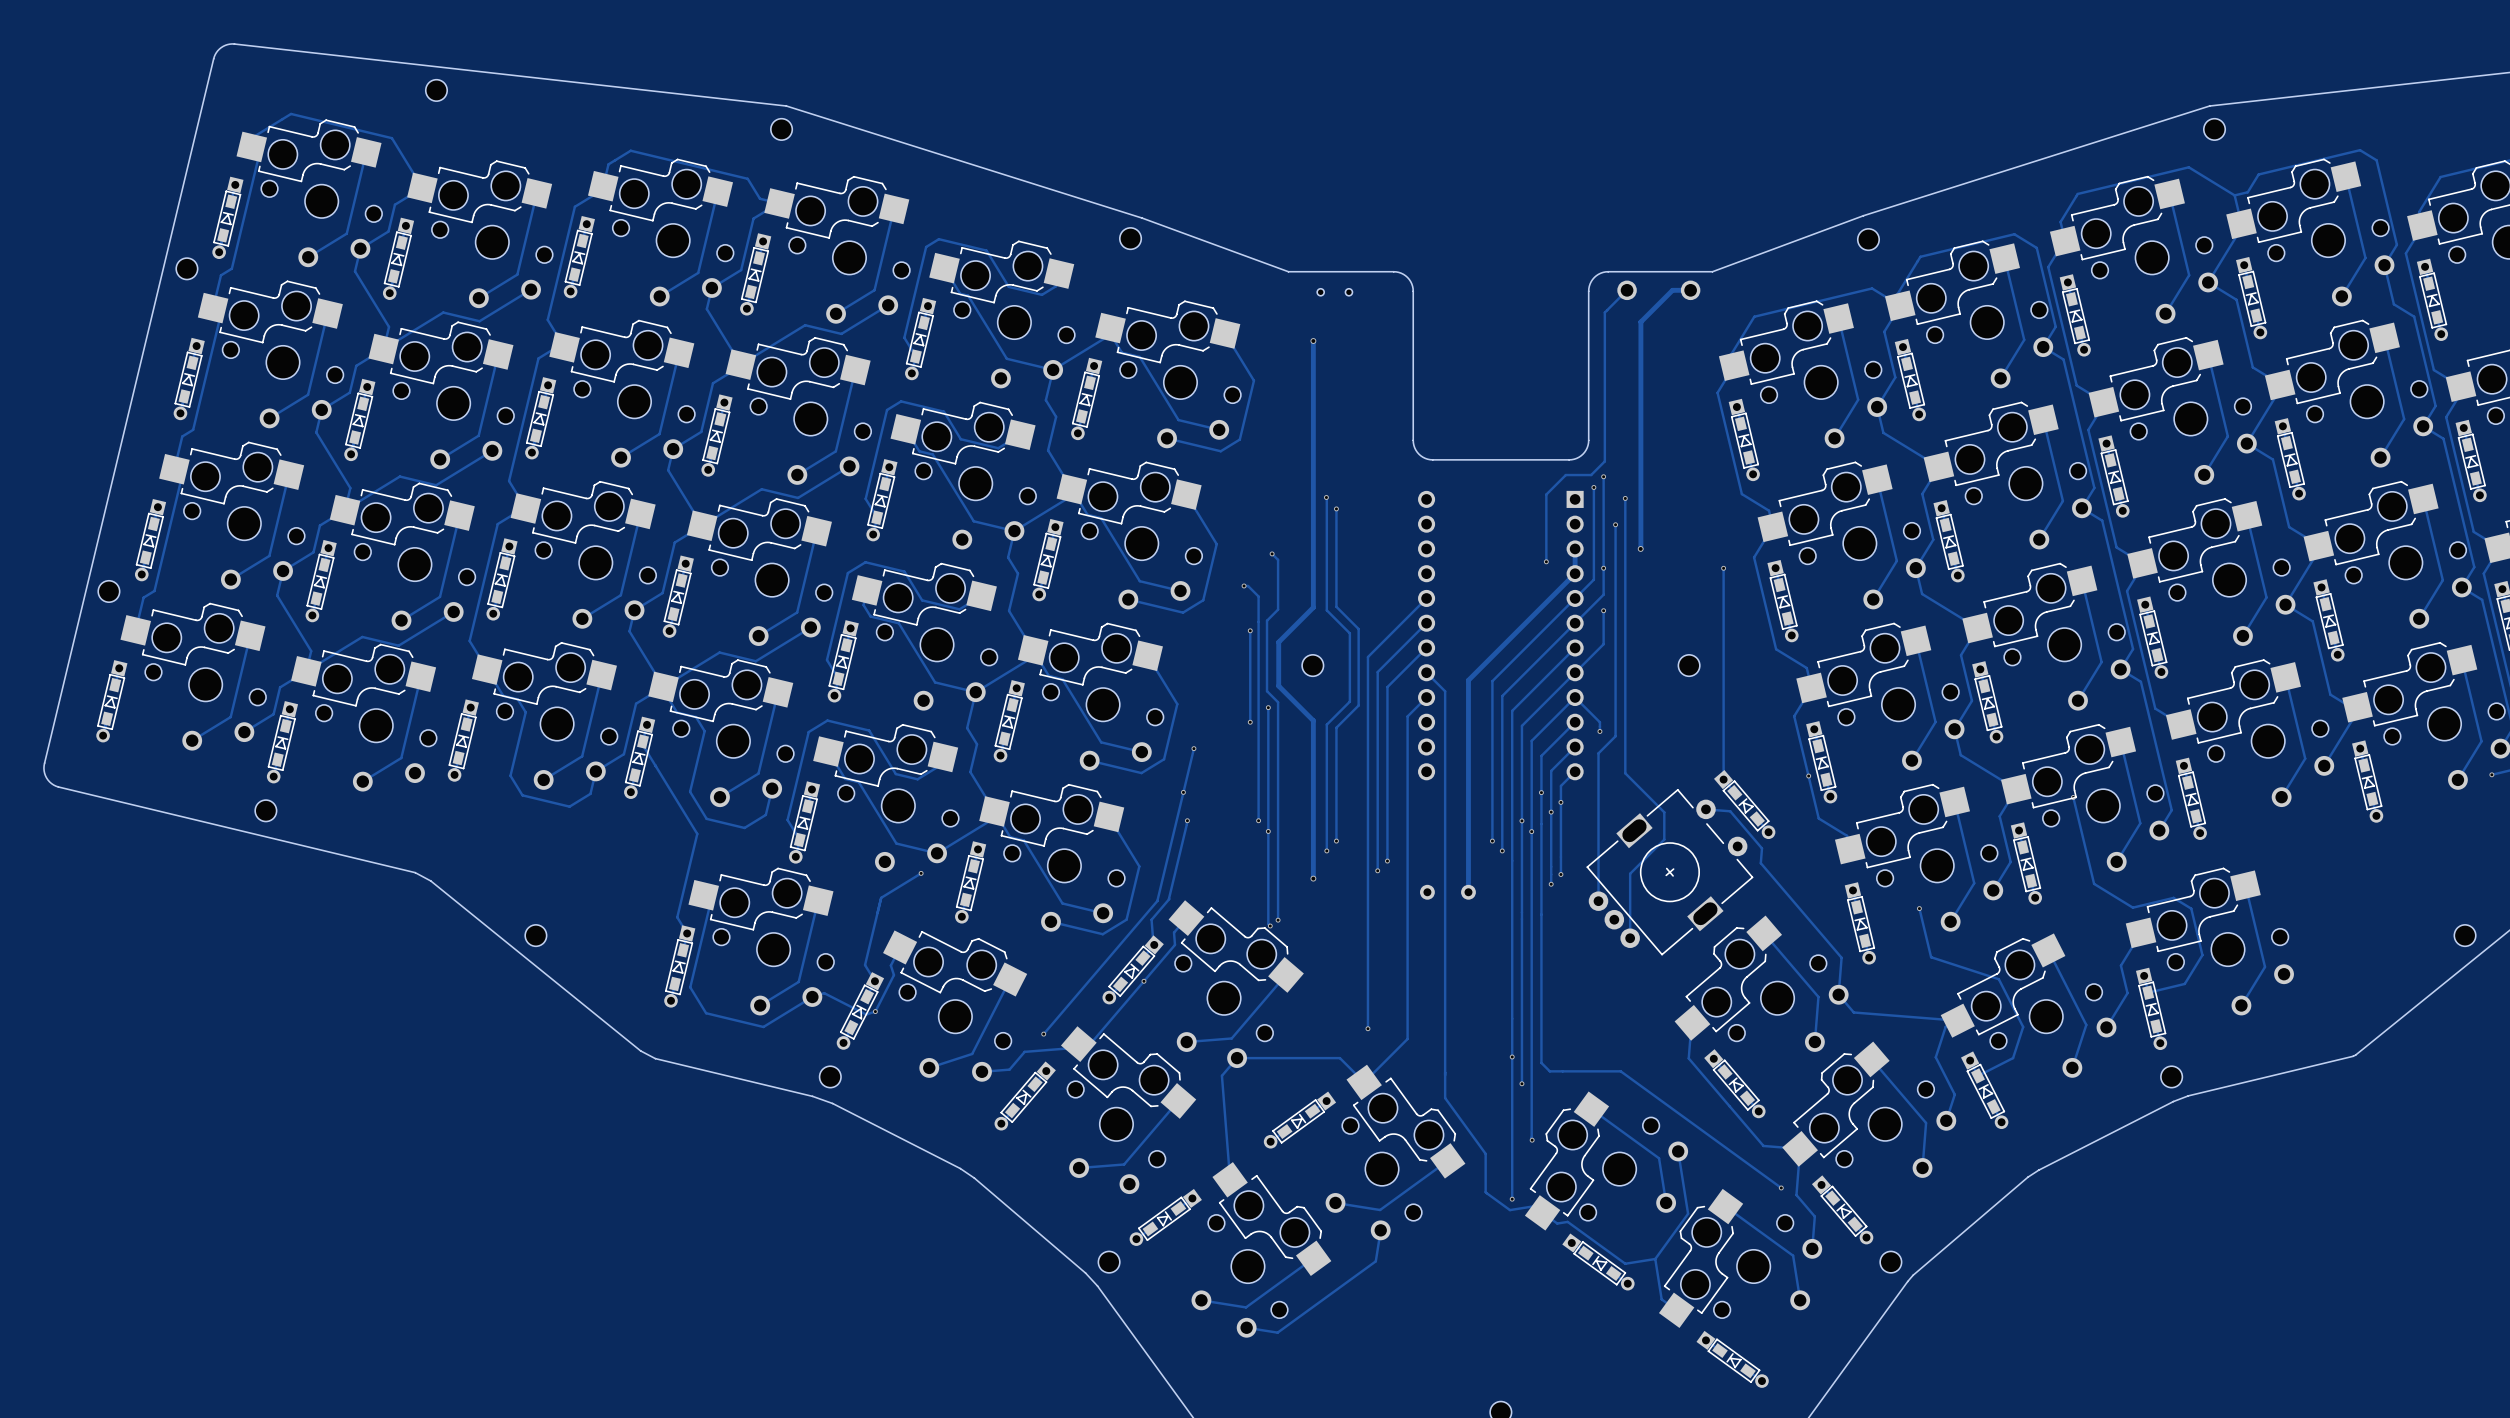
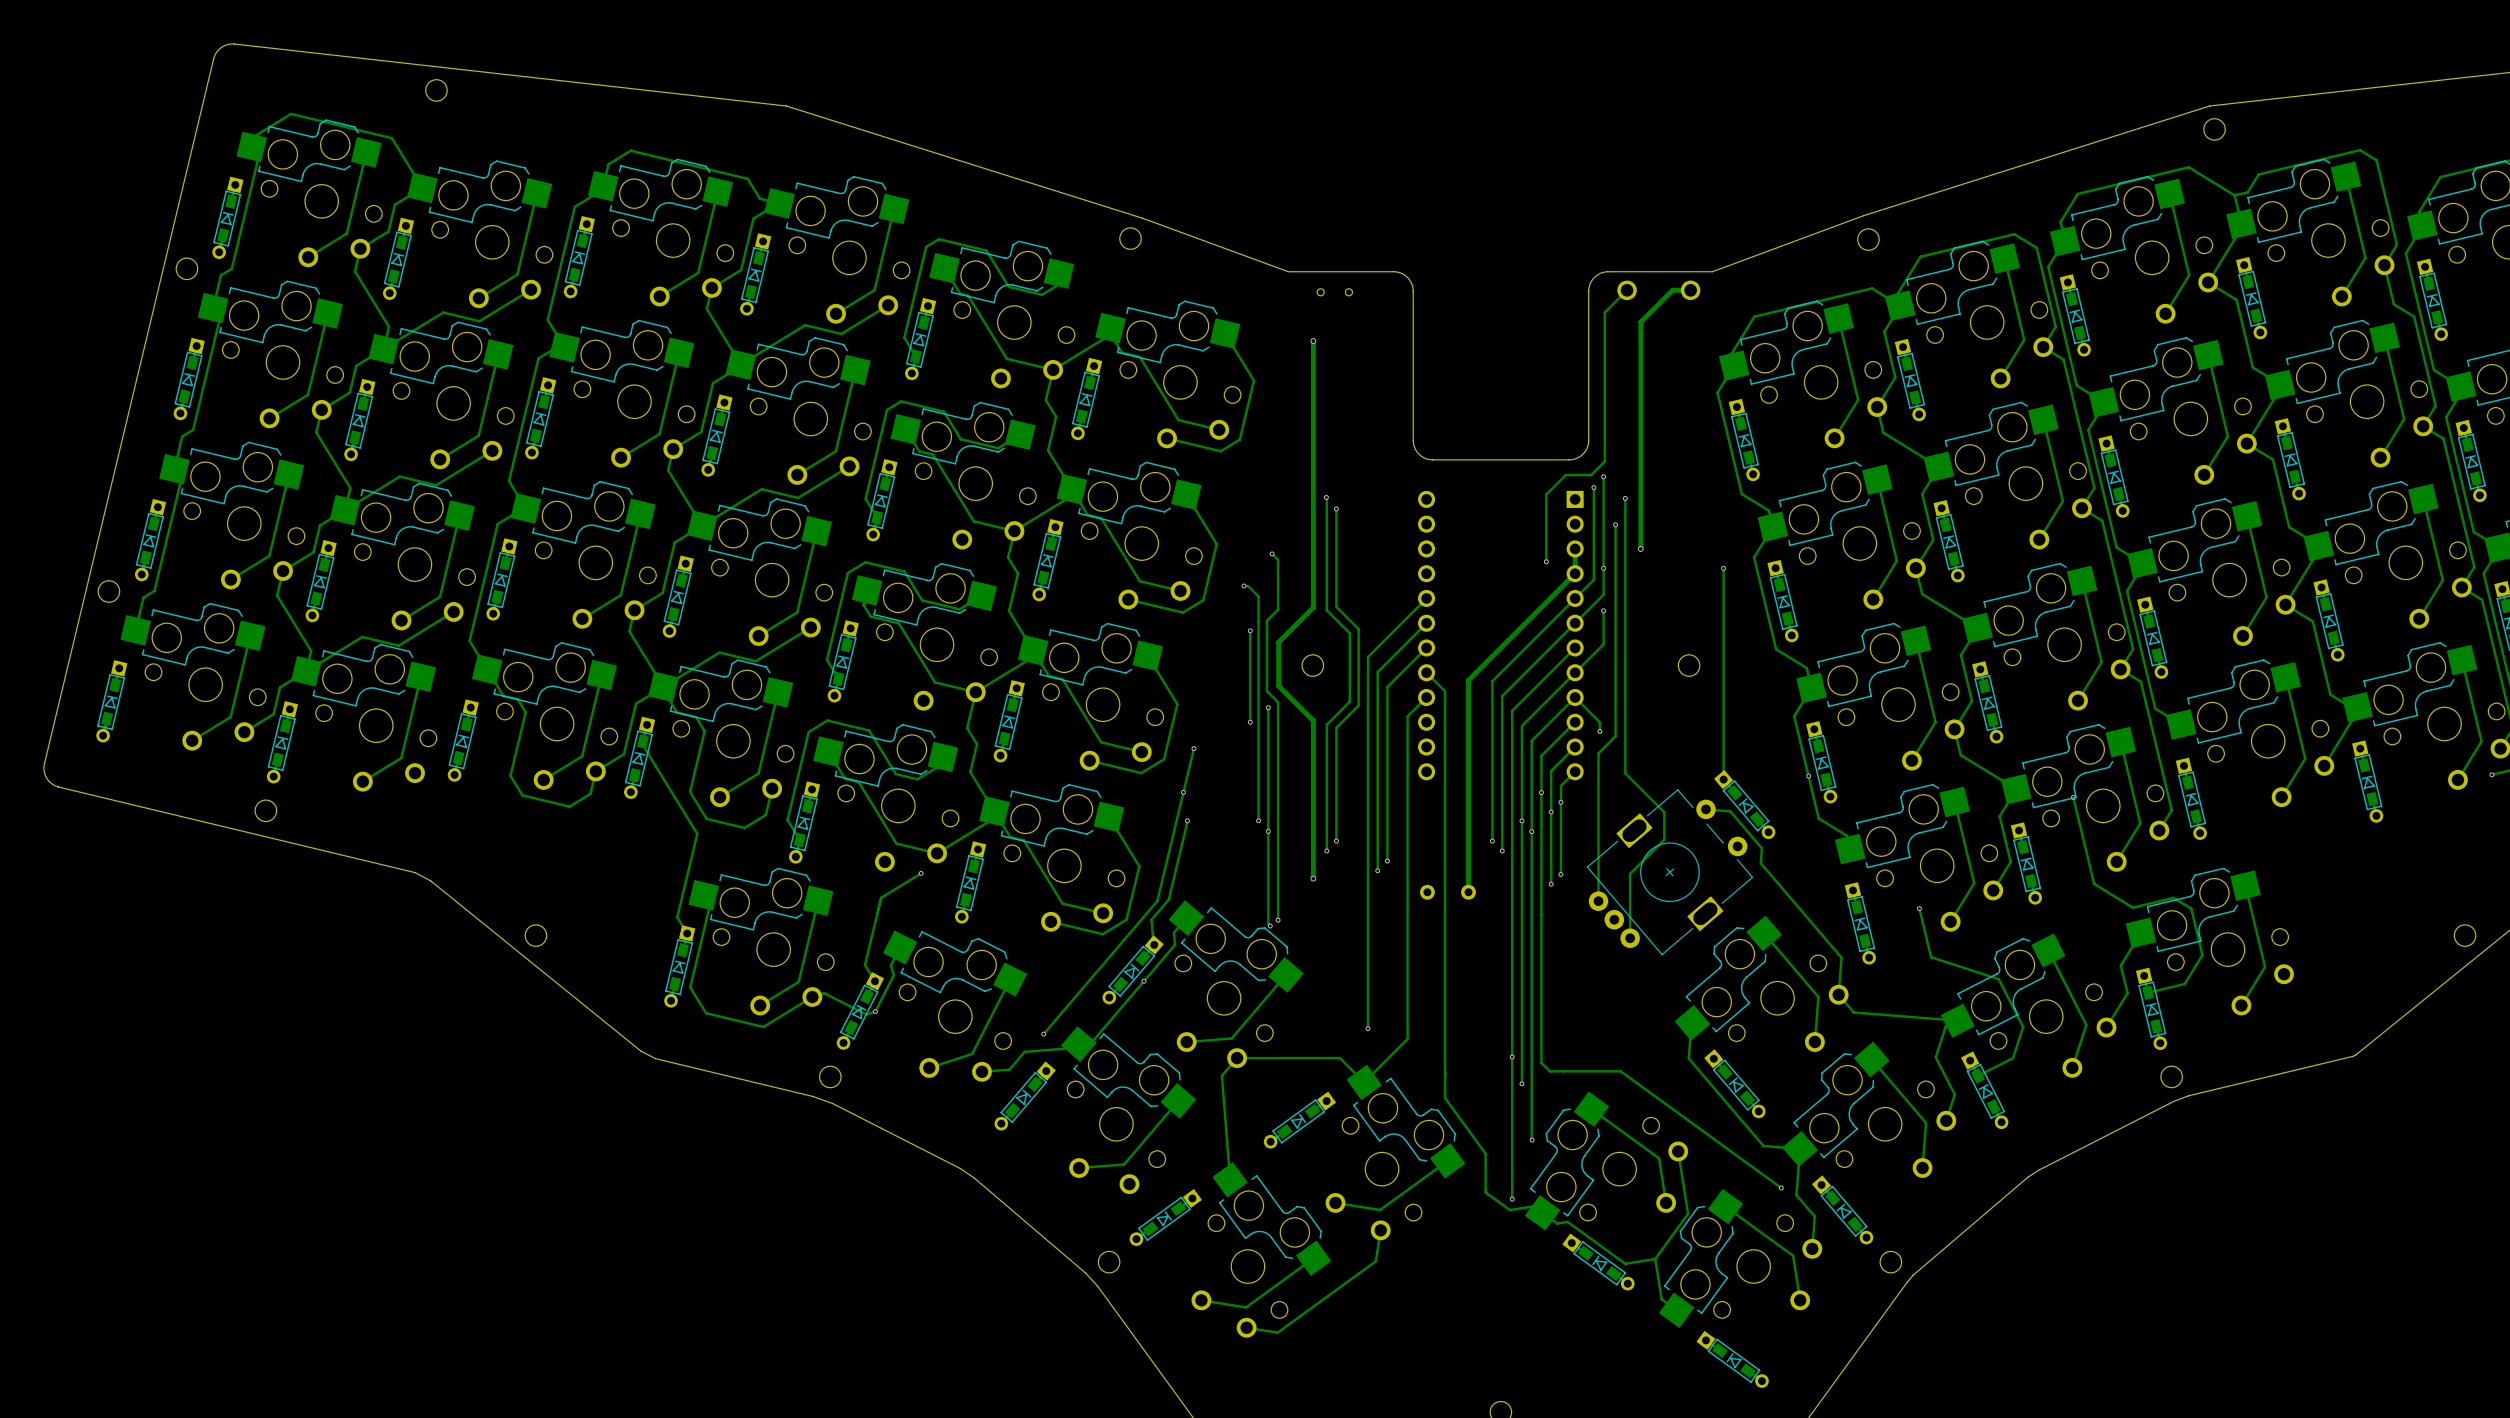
part: (781, 129) -> none

